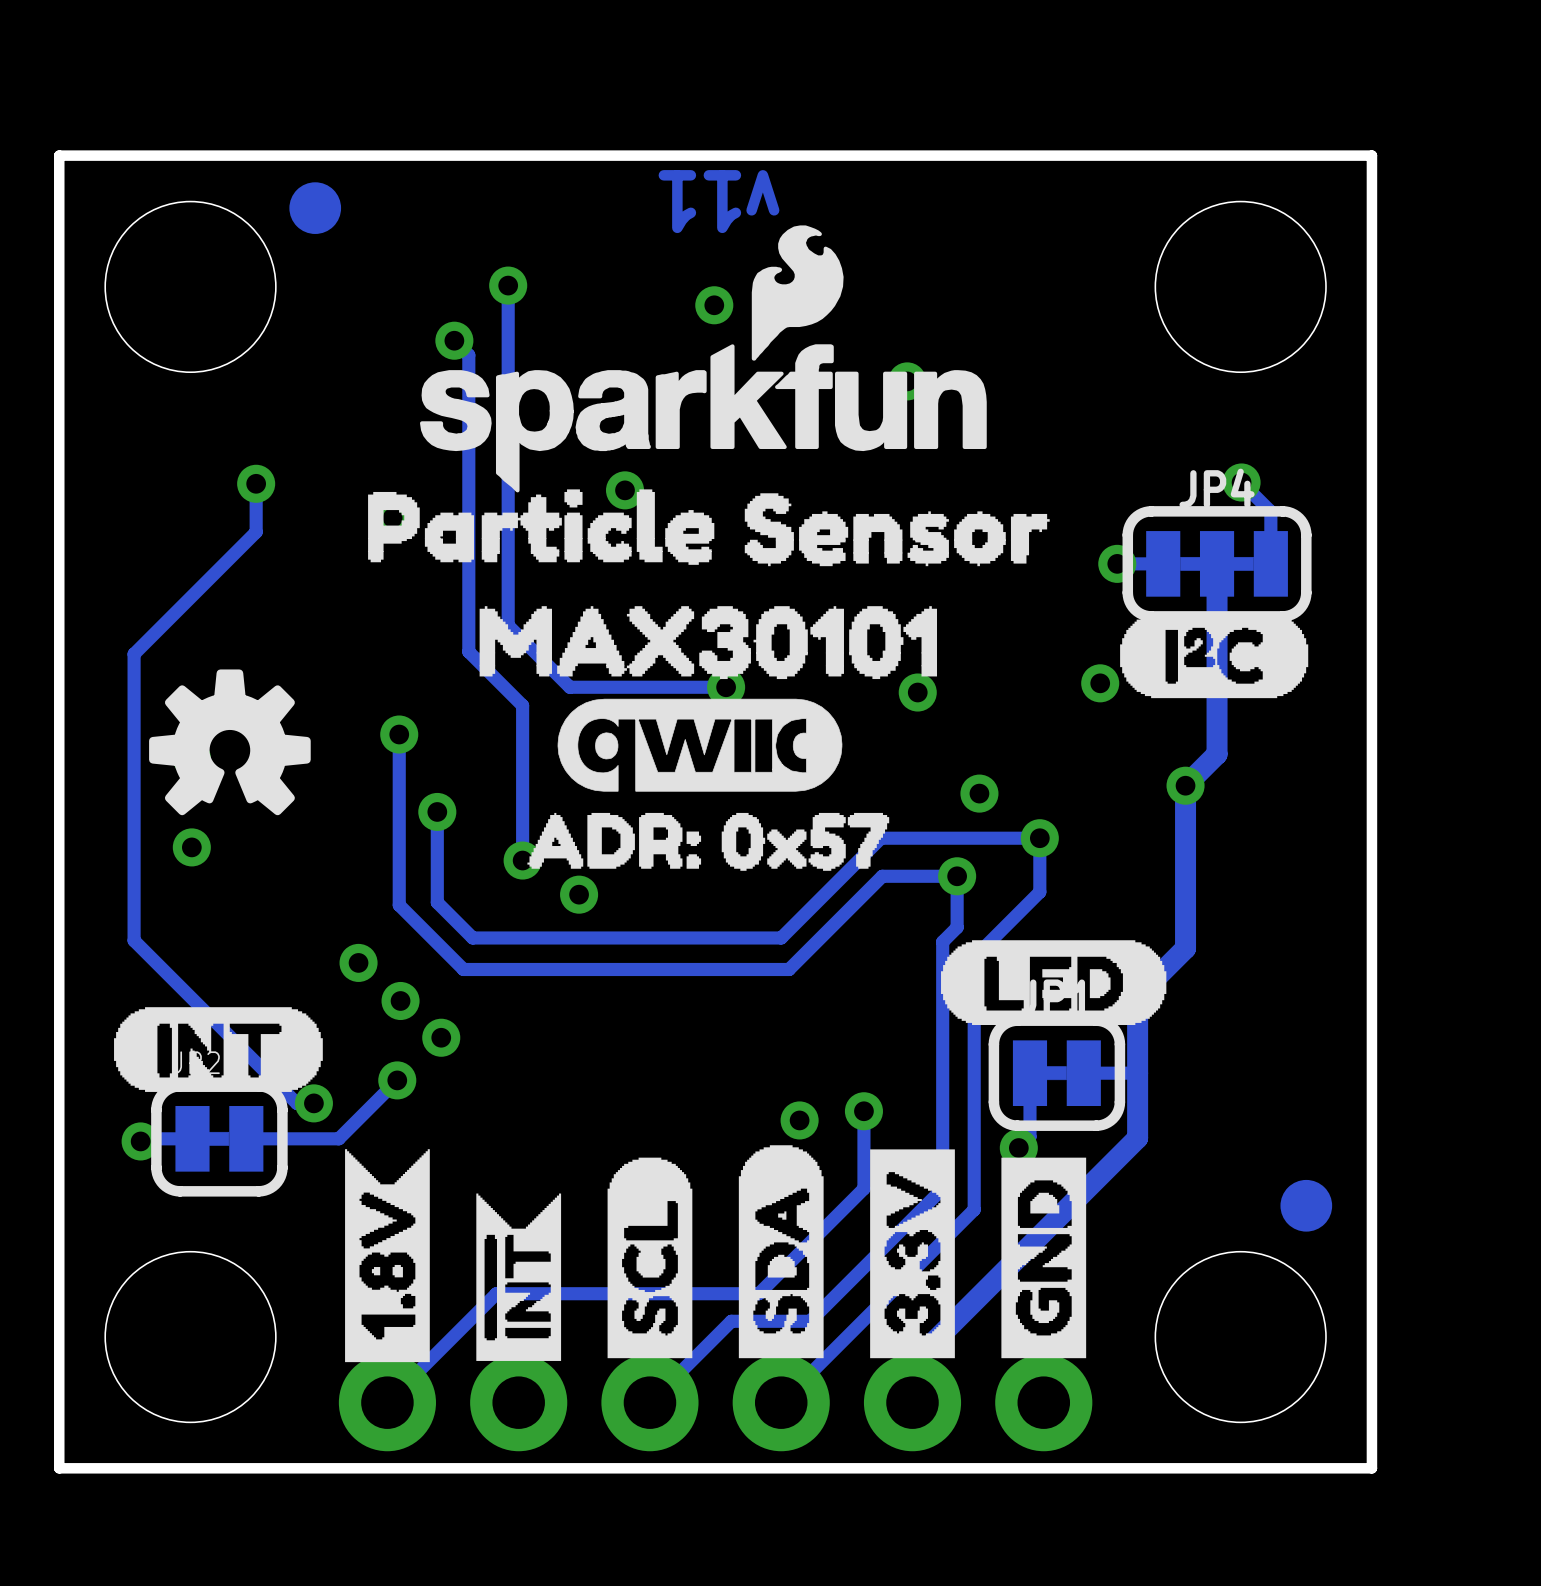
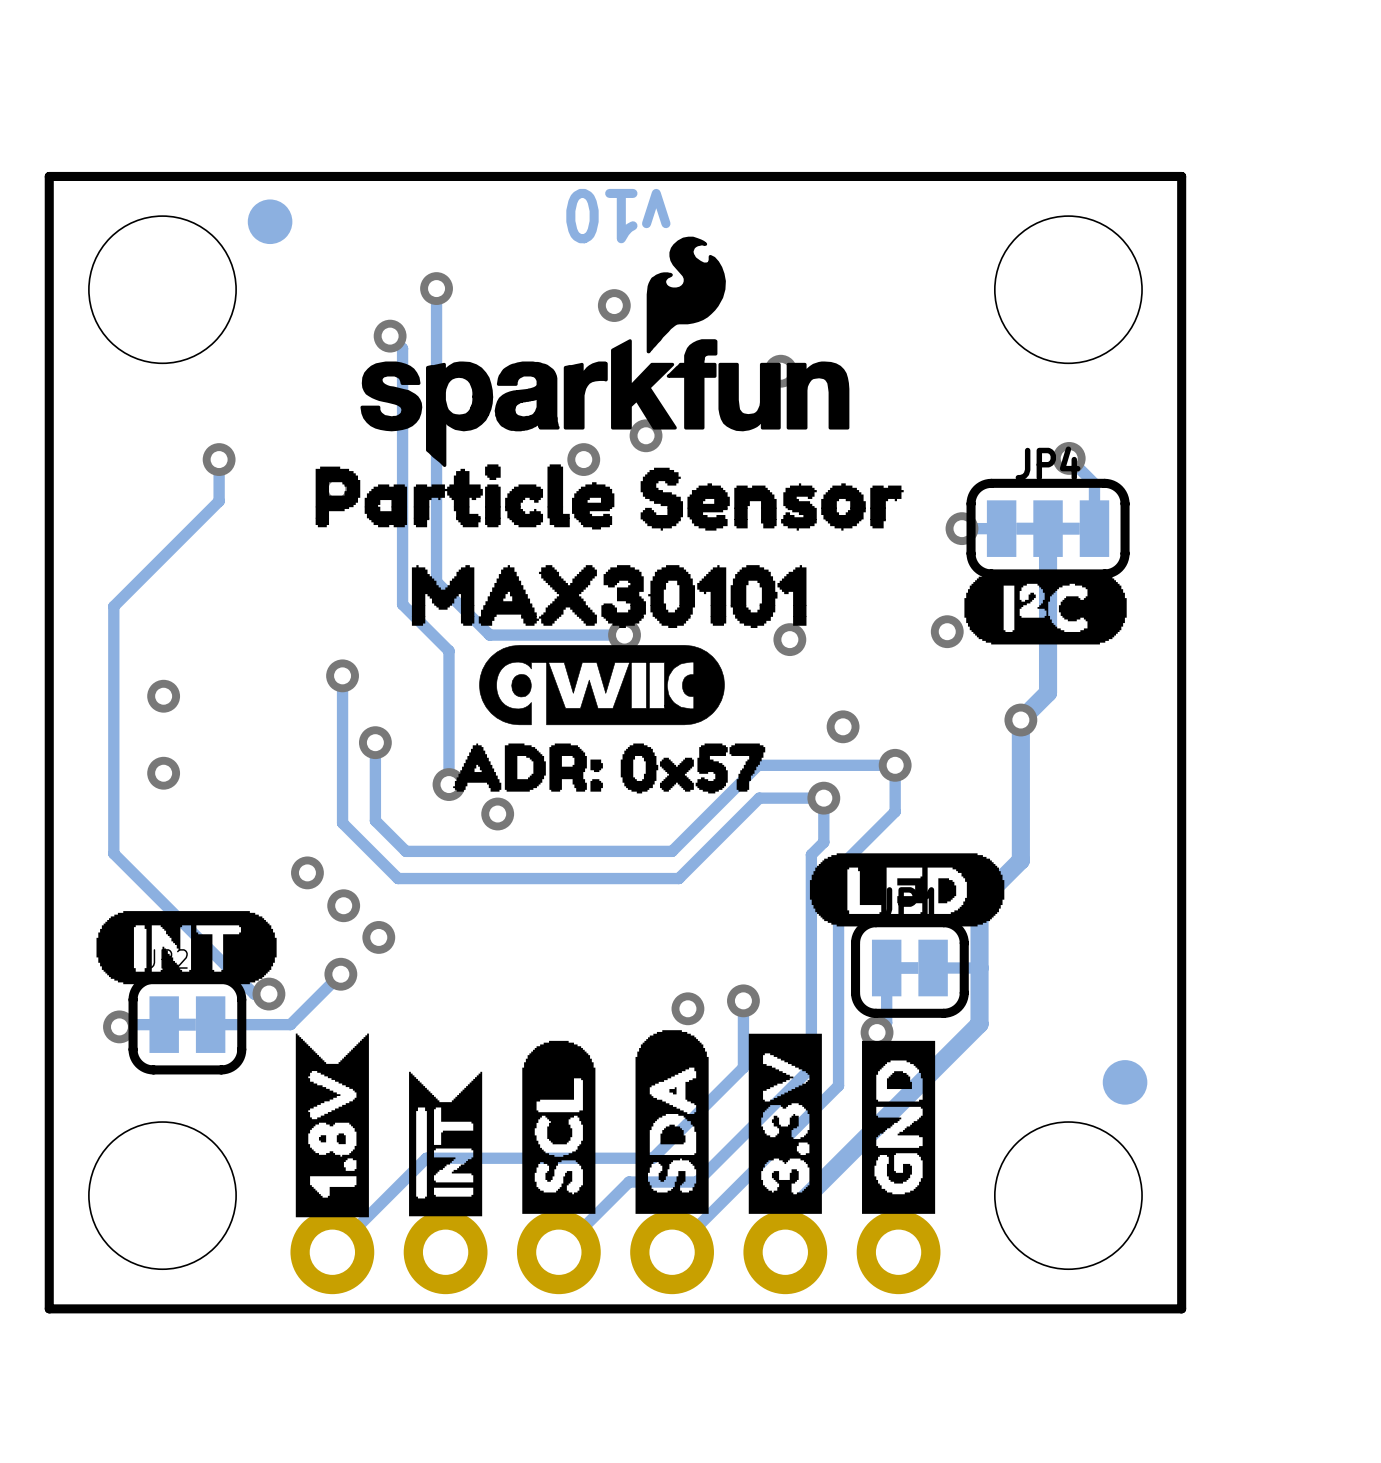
text: v11 (719, 201) -> v10 (618, 216)
via: none -> (646, 435)
via position: (625, 490) -> (583, 459)
drawing: [149, 669, 311, 816] -> none

